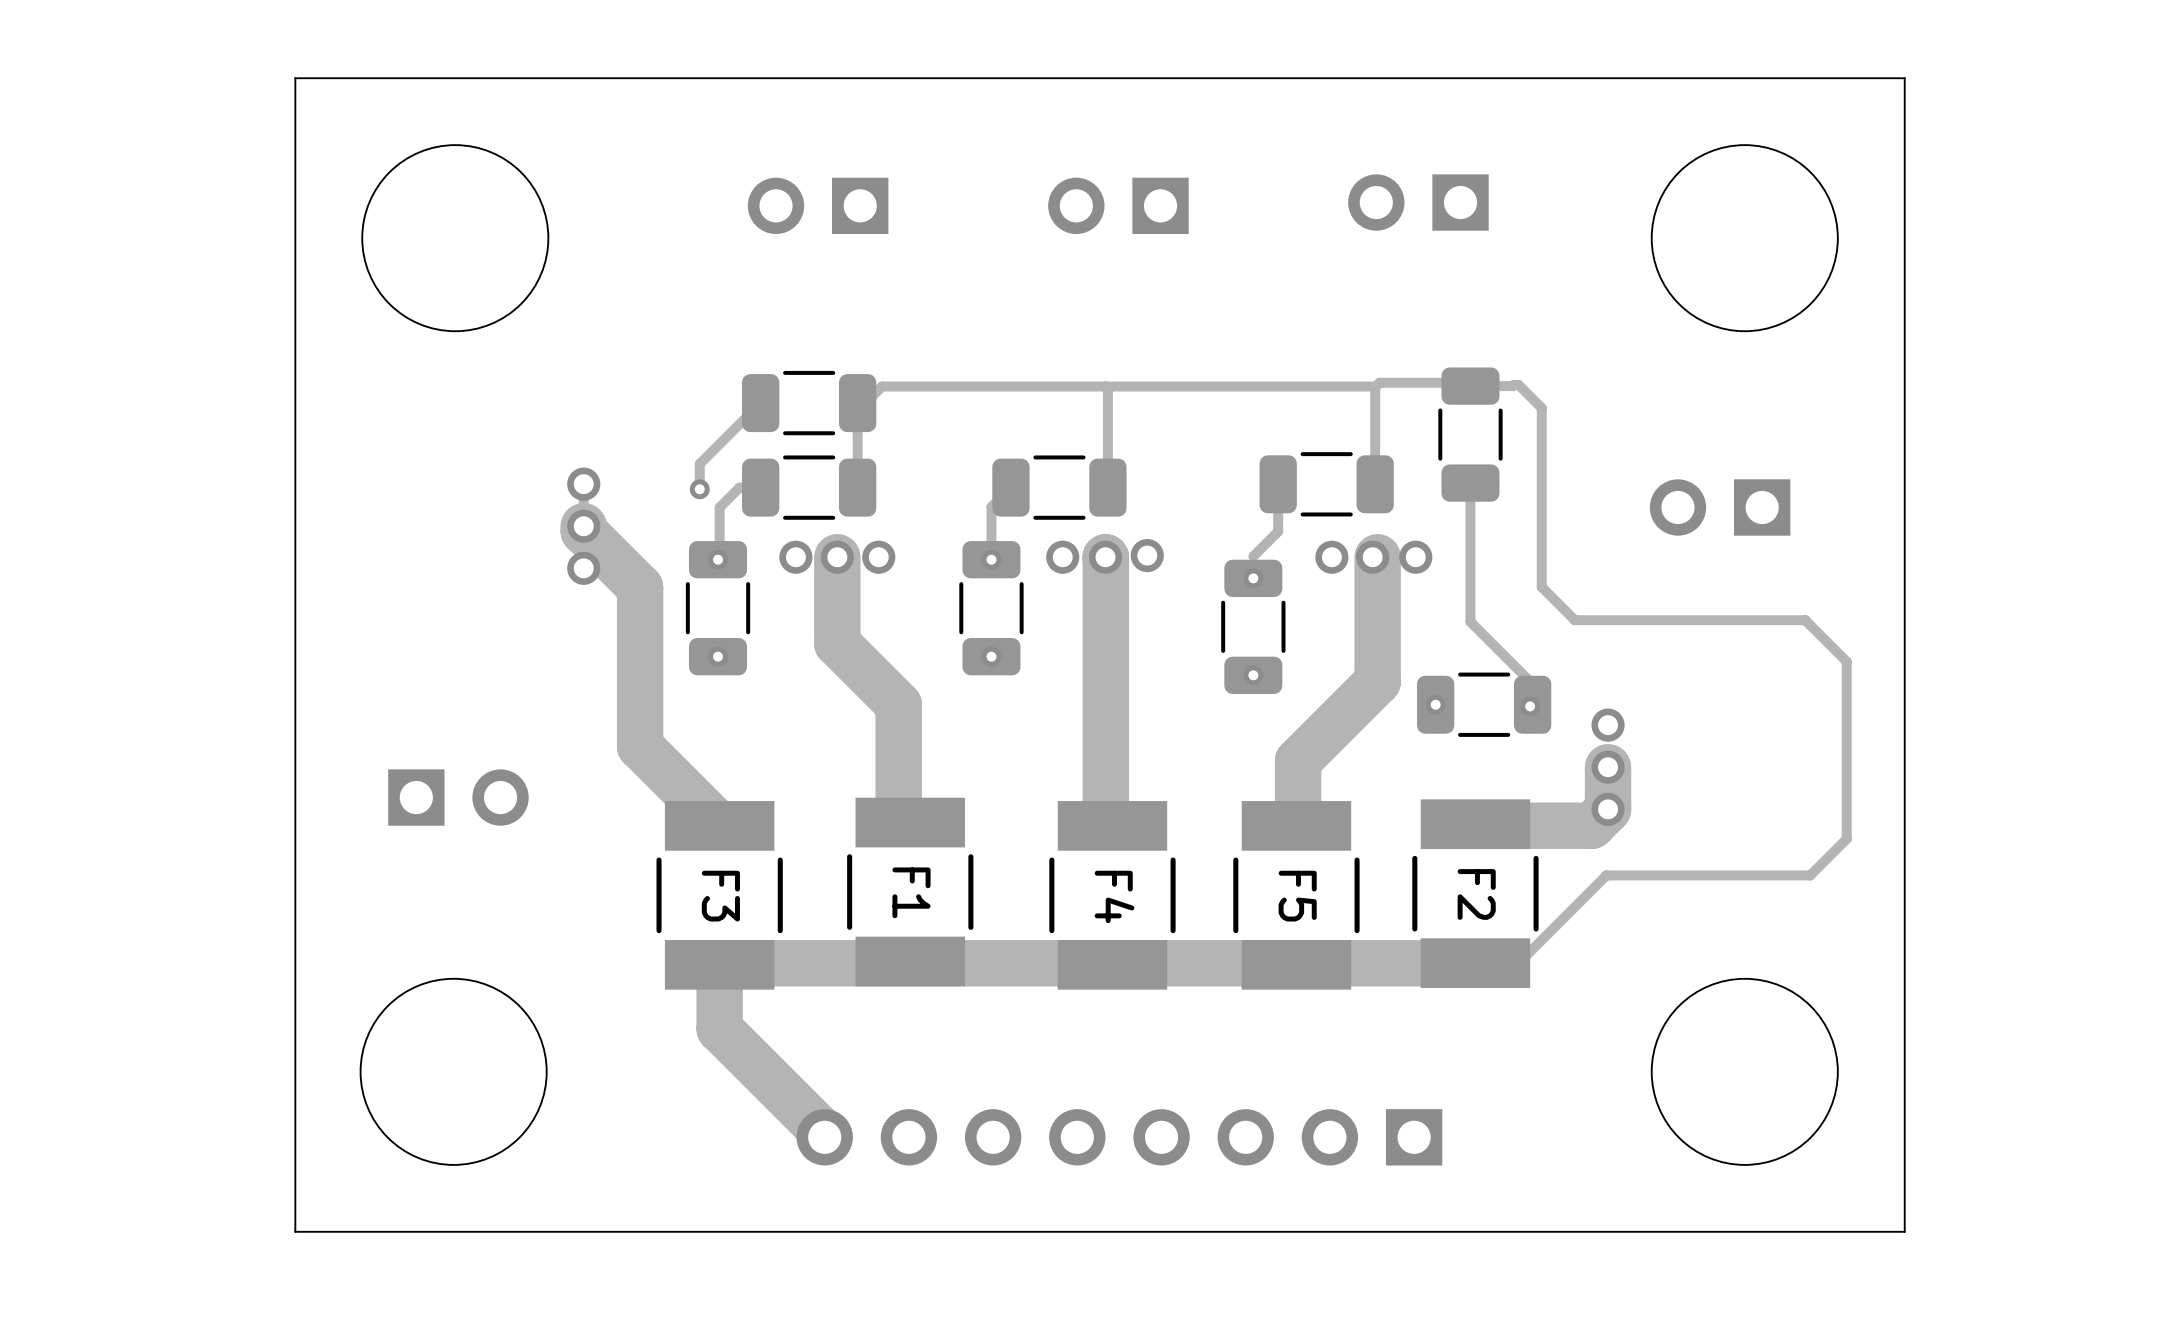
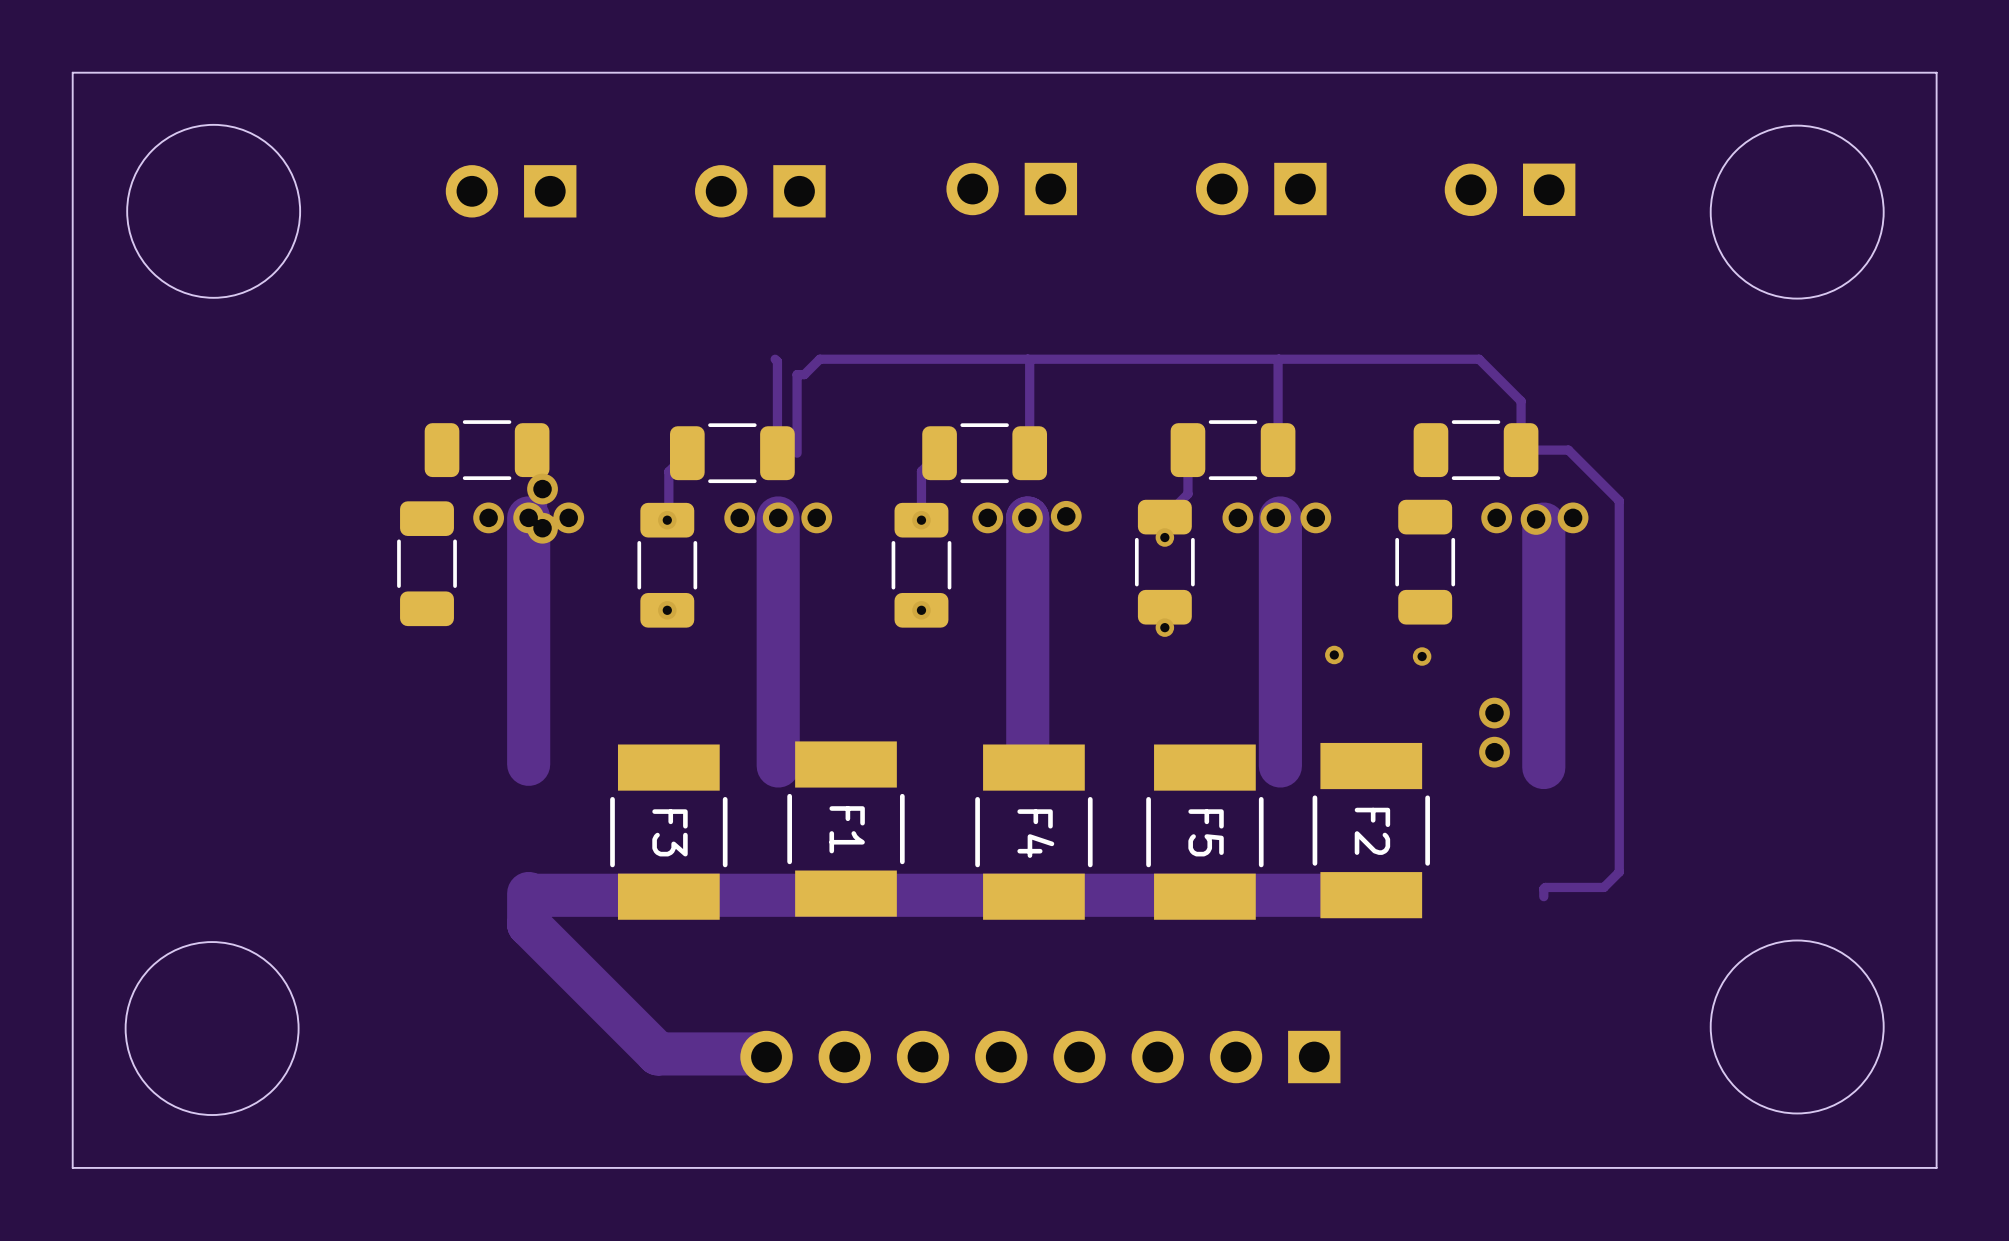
board edge: (1904, 78) (1904, 1231) (295, 1231) (295, 78) -> (1770, 72) (1936, 72) (1936, 1167) (72, 1167) (72, 72) (274, 72)
part position: (1418, 202) -> (1261, 189)
part: none -> (1510, 189)
part: none -> (511, 191)
part position: (1118, 205) -> (1011, 189)
round board edge position: (455, 238) -> (213, 211)
round board edge position: (1744, 238) -> (1797, 212)
track: none -> (775, 359) (777, 361) (777, 453)
track: (1376, 386) (1379, 382) (1467, 382) (1470, 386) (1518, 384) (1541, 408) (1541, 587) (1574, 620) (1805, 620) (1846, 661) (1846, 838) (1810, 875) (1606, 875) (1521, 959) (1506, 959) (1503, 963) -> (1278, 359) (1479, 359) (1521, 401) (1521, 450) (1568, 450) (1619, 500) (1619, 872) (1603, 887) (1545, 887) (1543, 896)
track: (760, 403) (699, 463) (699, 489) -> none
part: (809, 403) -> none
part: (1470, 434) -> none
track: (1470, 483) (1470, 621) (1532, 684) (1532, 704) -> none
part: none -> (487, 450)
via: (583, 484) -> none
part: none -> (1476, 450)
part position: (809, 487) -> (732, 453)
via: (699, 489) -> none
part: (1720, 507) -> none
track: (583, 526) (583, 531) (640, 587) (640, 746) (719, 825) -> none
via: none -> (488, 517)
track: none -> (528, 517) (528, 764)
via: none -> (528, 517)
via: none -> (568, 517)
via: none -> (1496, 517)
via: none -> (1573, 517)
via: none -> (1536, 519)
track: none -> (1543, 524) (1543, 767)
part: none -> (1425, 562)
part: none -> (427, 563)
part position: (1253, 626) -> (1164, 562)
track: (837, 643) (898, 704) (898, 810) (910, 822) -> (778, 597) (778, 766)
track: (1377, 681) (1298, 761) (1296, 825) -> (1280, 633) (1280, 766)
part: (1484, 704) -> none
via: (1608, 725) -> none
track: (1608, 767) (1608, 809) (1591, 825) (1475, 824) -> none
part: (458, 797) -> none
track: (721, 963) (719, 1028) (824, 1134) (824, 1137) -> (670, 895) (530, 895) (528, 893) (528, 924) (658, 1053) (766, 1053)
round board edge position: (453, 1071) -> (212, 1028)
round board edge position: (1744, 1071) -> (1797, 1026)

